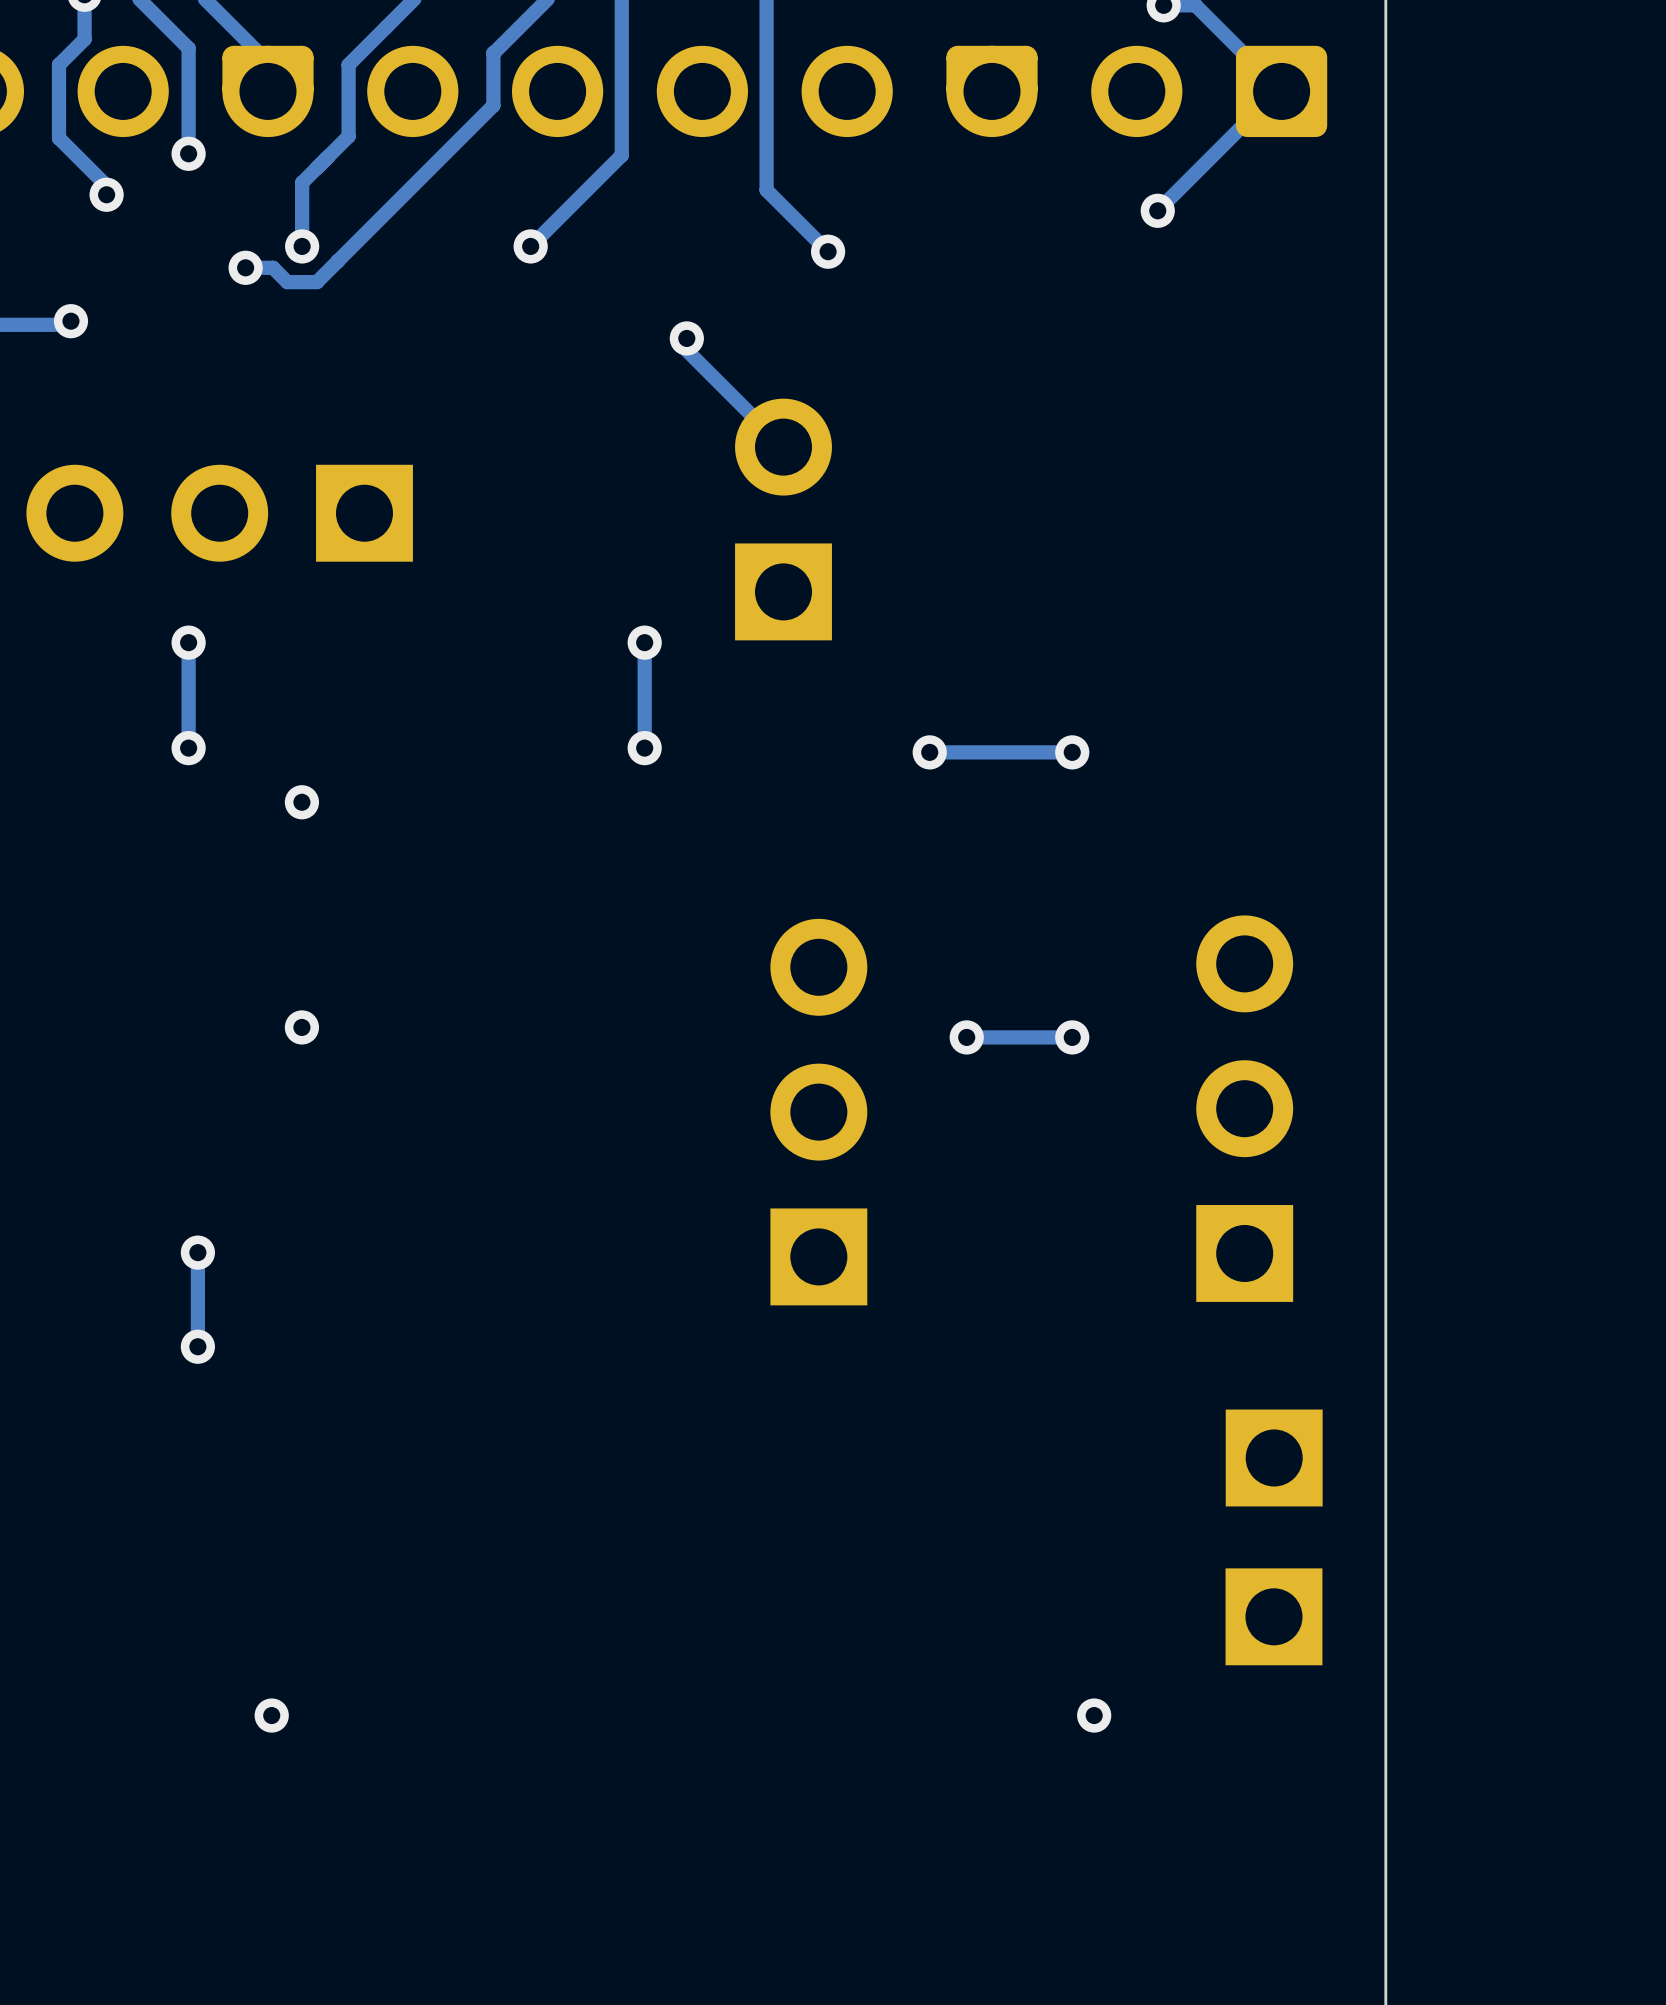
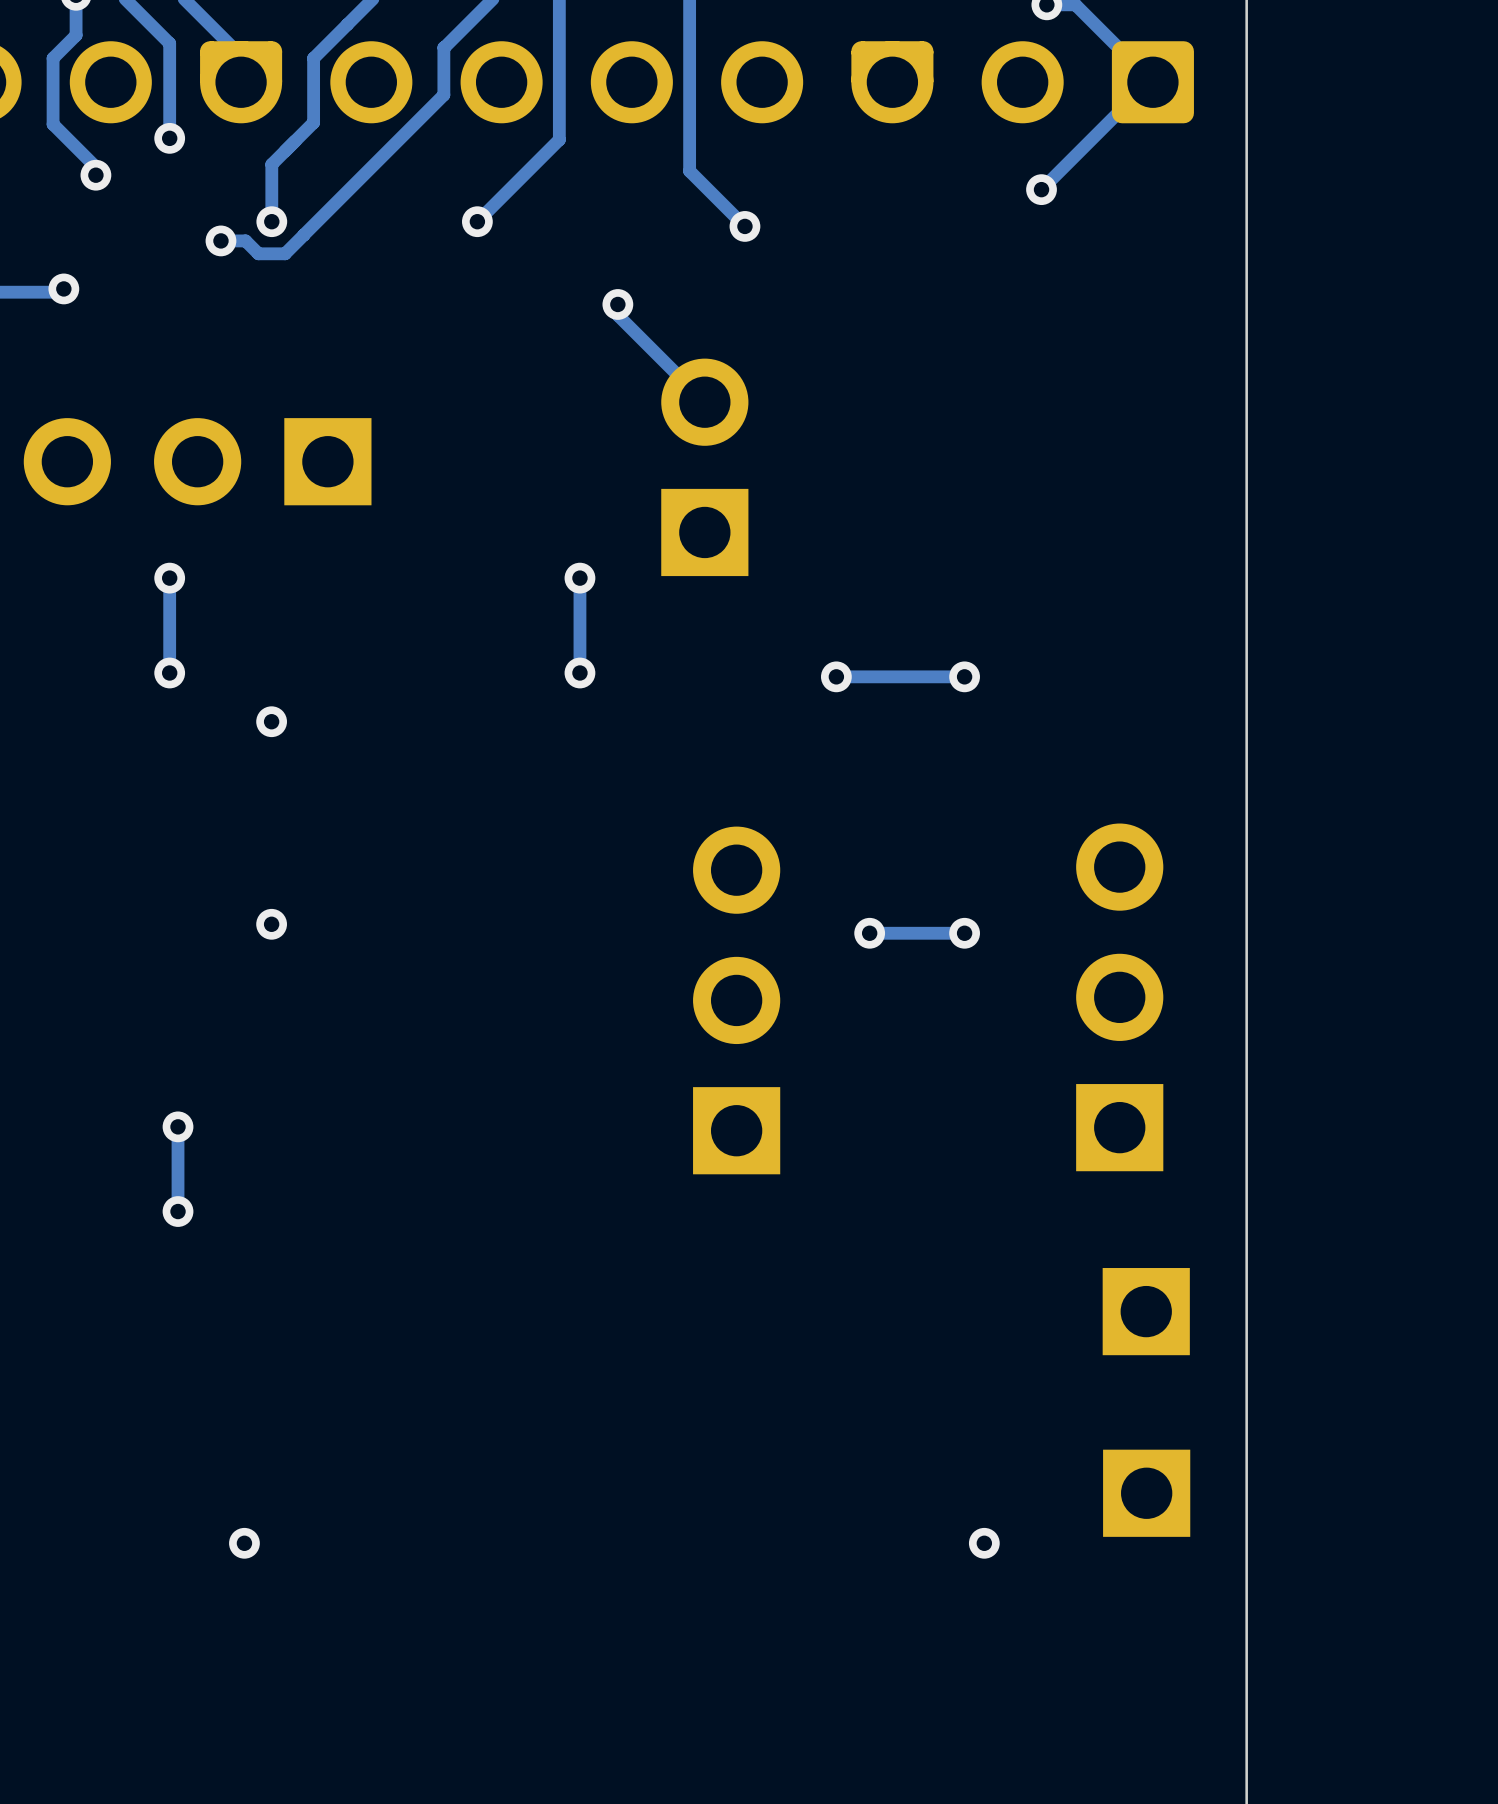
part position: (1273, 1616) -> (1146, 1493)

